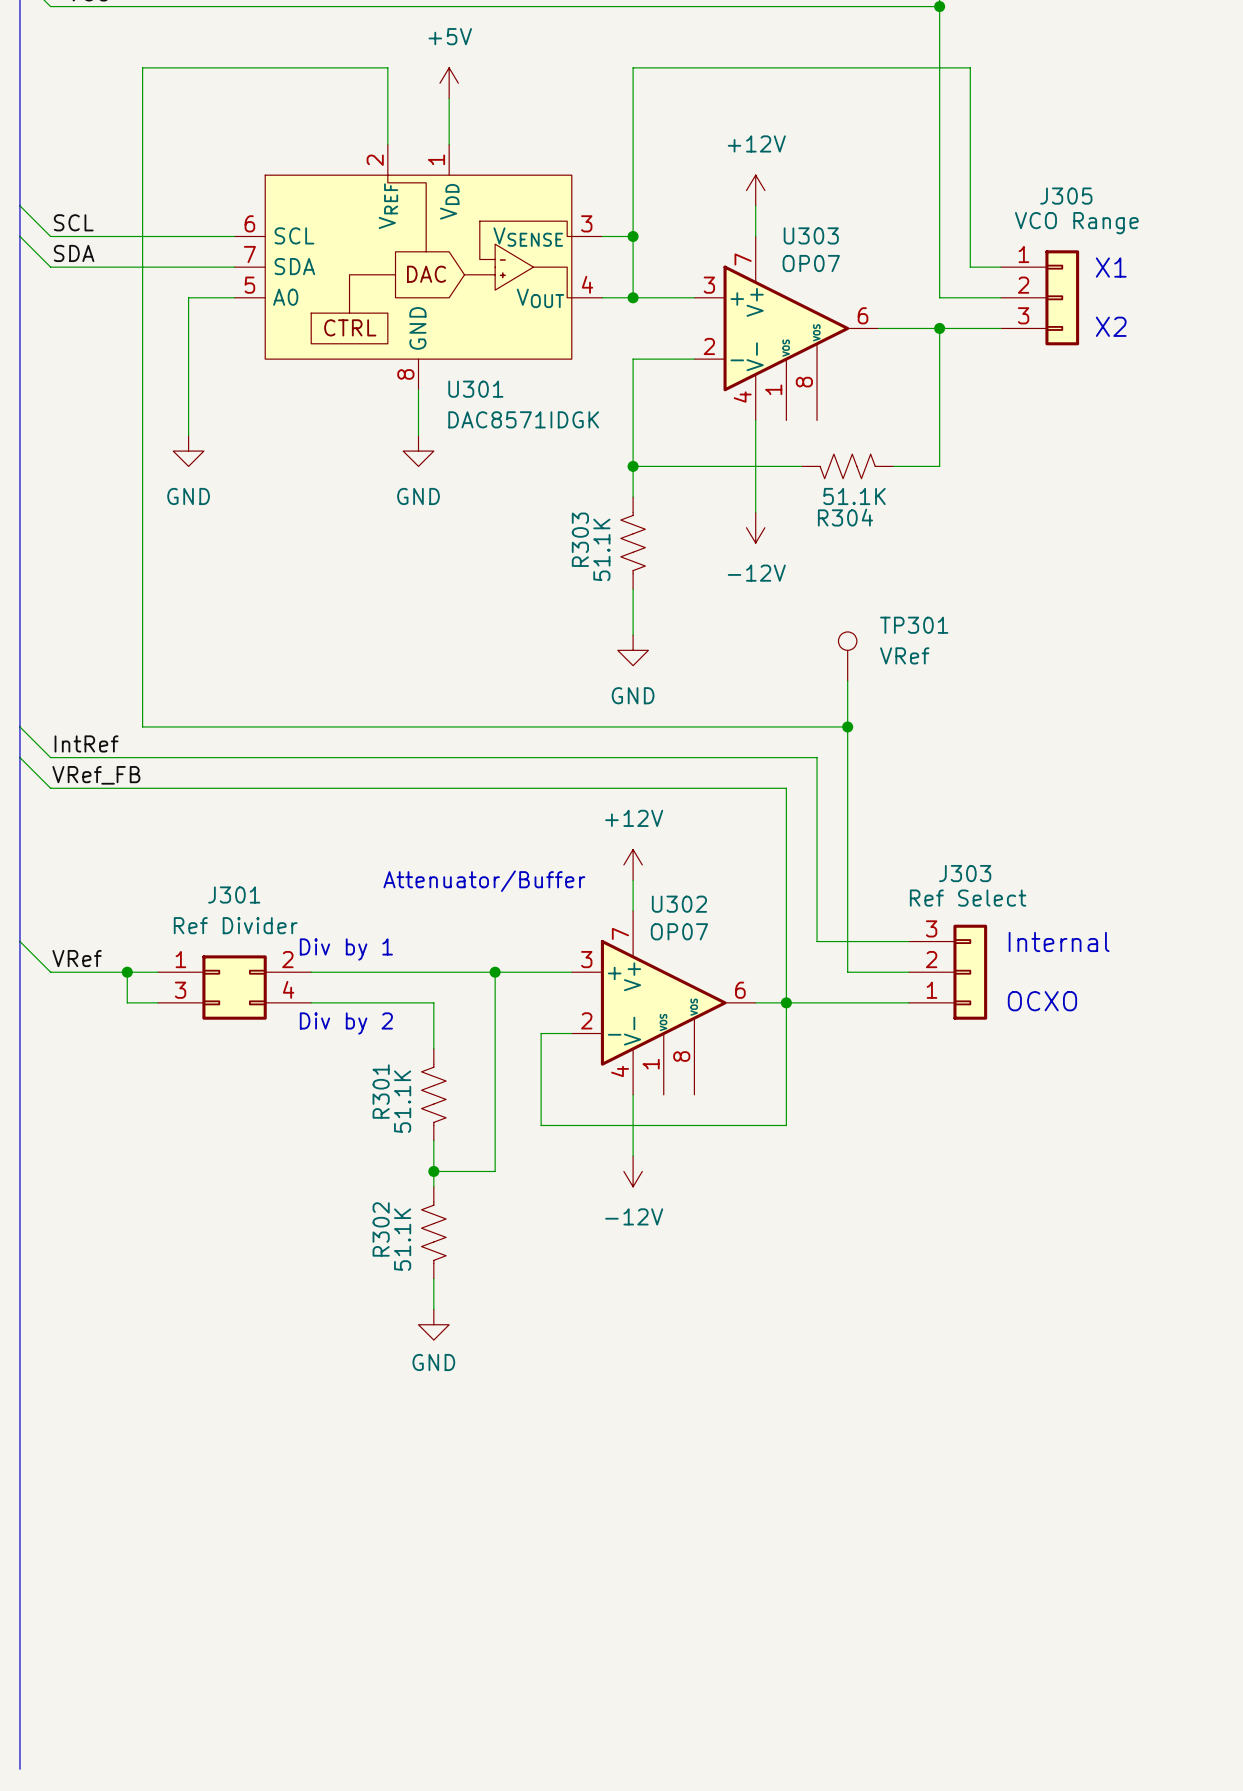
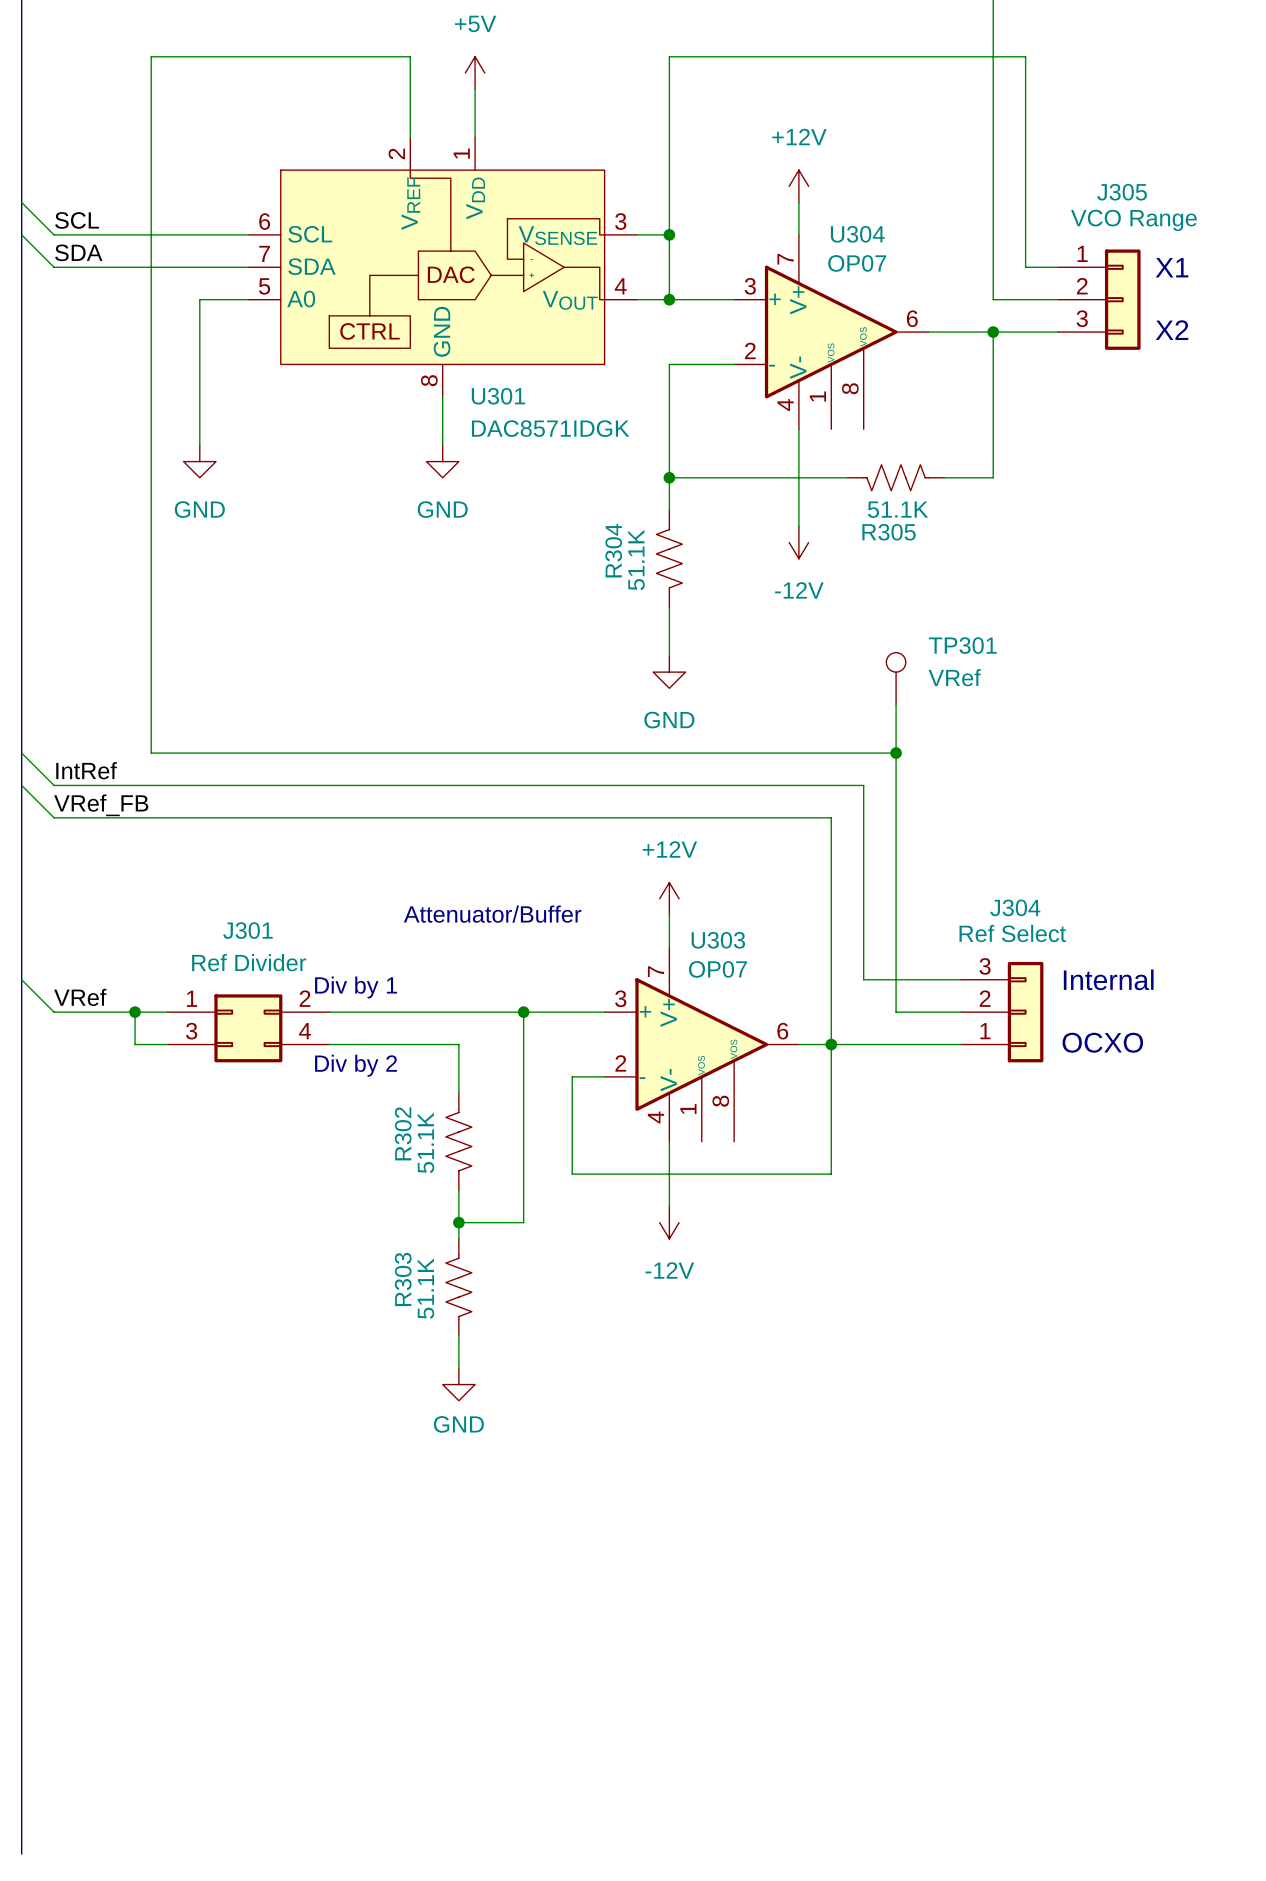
U303 name: U303 (811, 235) -> U304 (857, 234)
R304 name: R304 (845, 517) -> R305 (889, 532)
R303 name: R303 (580, 539) -> R304 (613, 550)
J303 name: J303 (965, 873) -> J304 (1015, 907)
U302 name: U302 (679, 904) -> U303 (718, 940)
R301 name: R301 (381, 1091) -> R302 (403, 1133)
R302 name: R302 (381, 1229) -> R303 (403, 1279)

